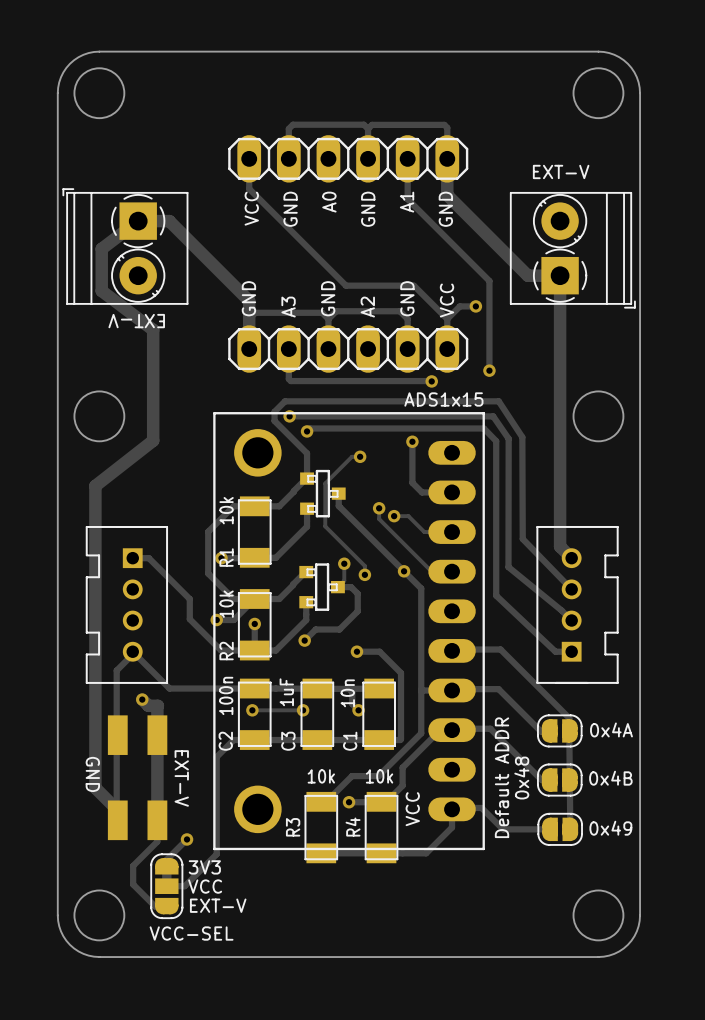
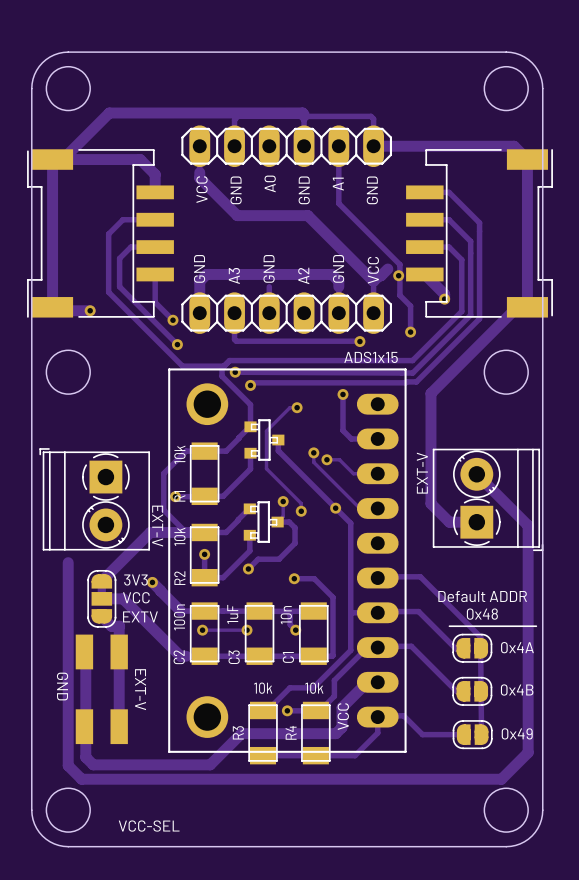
track: none -> (304, 114) (109, 113) (62, 159)
track: (447, 158) (447, 195) (527, 275) (560, 275) (560, 546) (571, 558) -> (373, 146) (514, 146) (527, 159) (527, 307) (517, 307) (430, 393) (430, 503) (449, 522) (476, 522)
text: EXT-V (561, 171) -> none
track: (249, 188) (346, 285) (413, 285) (447, 319) (459, 306) (475, 306) -> (199, 172) (199, 178) (237, 215) (307, 215) (373, 281) (387, 269)
part footprint: [509, 191, 636, 309] -> [406, 149, 553, 318]
track: (407, 199) (489, 280) (489, 341) -> (338, 181) (338, 203) (399, 264) (399, 295) (410, 306)
track: none -> (155, 192) (155, 174) (140, 159) (52, 159) (52, 307) (56, 310) (90, 310)
track: none -> (155, 219) (123, 219) (108, 234) (108, 292) (182, 366) (224, 366)
part: (125, 246) -> none
part: none -> (100, 233)
track: none -> (155, 247) (130, 247) (119, 258) (119, 286) (177, 344)
track: none -> (155, 274) (155, 302) (172, 320)
track: none -> (424, 274) (444, 294) (444, 299)
track: (249, 312) (249, 300) (169, 221) (138, 221) (101, 248) (101, 290) (153, 329) (153, 440) (95, 485) (95, 788) (117, 810) (117, 820) -> none
track: (407, 319) (399, 311) (336, 311) (328, 319) (322, 312) (255, 312) (249, 319) (249, 349) -> (338, 286) (338, 281) (331, 274) (206, 274) (199, 281)
text: EXT-V (136, 321) -> none
via: none -> (444, 299)
via: none -> (90, 310)
via: none -> (172, 320)
via: none -> (177, 344)
track: (283, 403) (285, 401) (498, 401) (522, 437) (522, 538) (571, 589) -> (229, 360) (412, 360) (461, 311) (461, 259) (449, 247) (424, 247)
track: (289, 416) (493, 416) (508, 438) (508, 567) (571, 620) -> (235, 372) (412, 373) (470, 315) (470, 241) (449, 219) (424, 219)
track: (483, 428) (496, 441) (496, 595) (555, 651) (571, 651) -> (405, 382) (416, 381) (479, 318) (479, 222) (449, 192) (424, 192)
text: none -> EXT-V (422, 473)
track: none -> (476, 474) (528, 525) (528, 752) (501, 779) (81, 779) (68, 765) (68, 562)
track: (132, 558) (148, 558) (189, 599) (189, 619) (221, 650) (254, 650) -> none
part: none -> (94, 499)
part: none -> (488, 499)
text: none -> EXT-V (157, 526)
track: (254, 599) (233, 620) (216, 620) -> (204, 532) (150, 532) (101, 581)
part: (126, 604) -> none
part: (577, 604) -> none
via: (216, 620) -> none
track: (132, 651) (169, 688) (227, 688) -> (152, 582) (180, 611)
track: (135, 651) (116, 670) (116, 812) -> none
via: none -> (152, 582)
text: none -> EXTV (140, 616)
via: (142, 699) -> none
line: none -> (449, 626) (536, 626)
track: (233, 740) (216, 756) (216, 854) (184, 886) (166, 886) -> (186, 656) (180, 656) (123, 598) (101, 598)
track: none -> (85, 660) (85, 757) (93, 764) (210, 764) (241, 733) (335, 733) (342, 727) (342, 707) (367, 682) (377, 682)
text rotation: 0° (502, 777) -> 90° clockwise (482, 596)
text rotation: 0° (521, 778) -> 90° clockwise (482, 614)
text position: 0x48 (521, 778) -> 0x48 (482, 614)
track: (157, 811) (157, 841) (133, 865) (133, 884) (155, 906) (166, 906) -> none
track: (187, 839) (166, 859) (166, 865) -> none
via: (187, 839) -> none
text position: 3V3 (204, 867) -> 3V3 (135, 580)
part position: (166, 886) -> (101, 598)
text position: VCC (205, 886) -> VCC (136, 597)
text: EXT-V (218, 905) -> none

